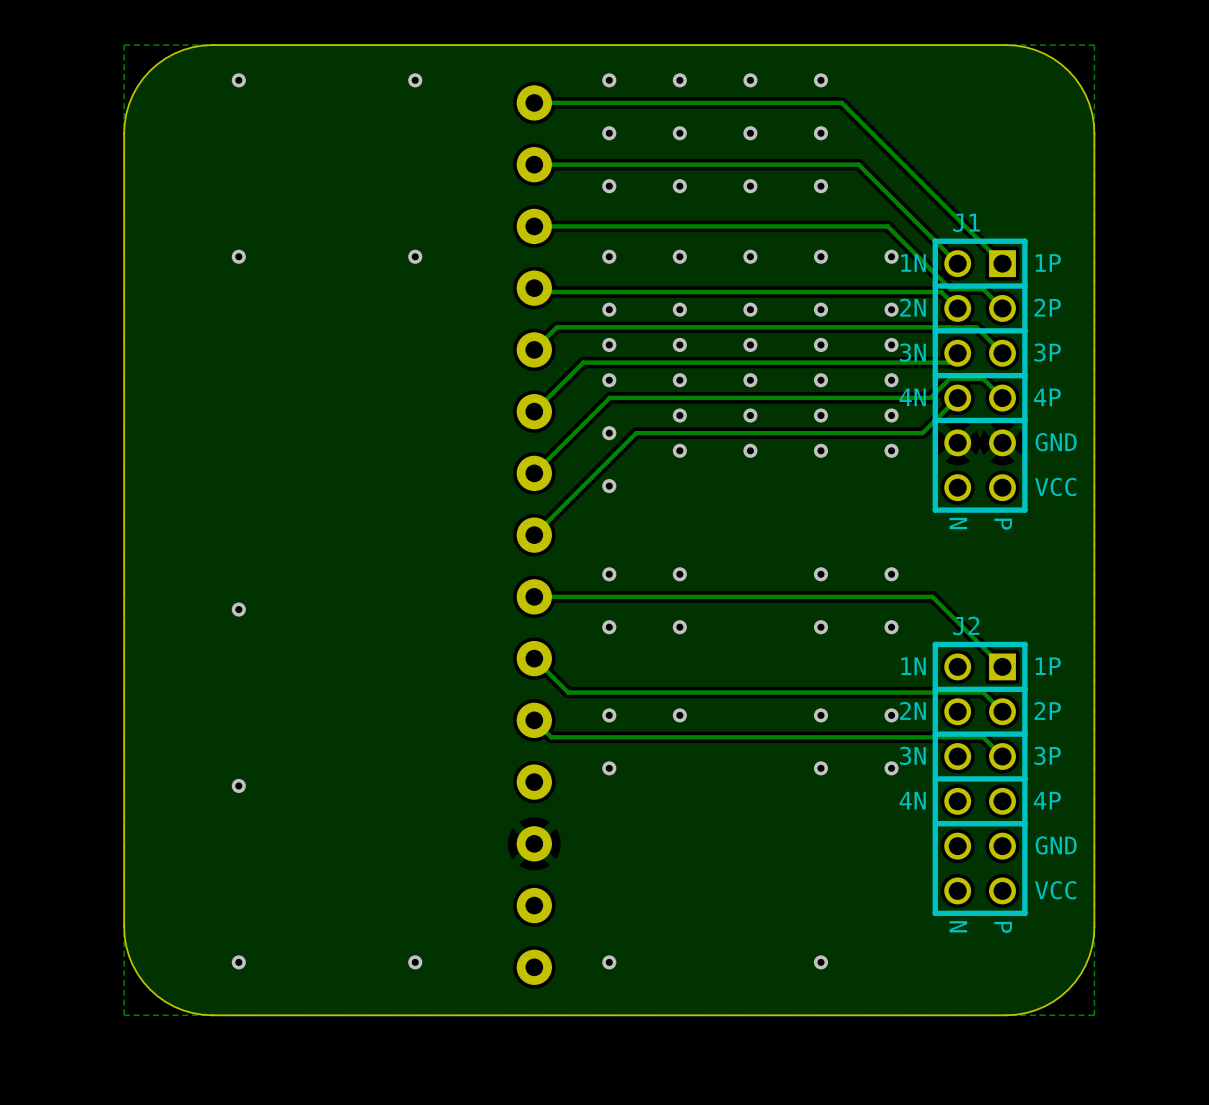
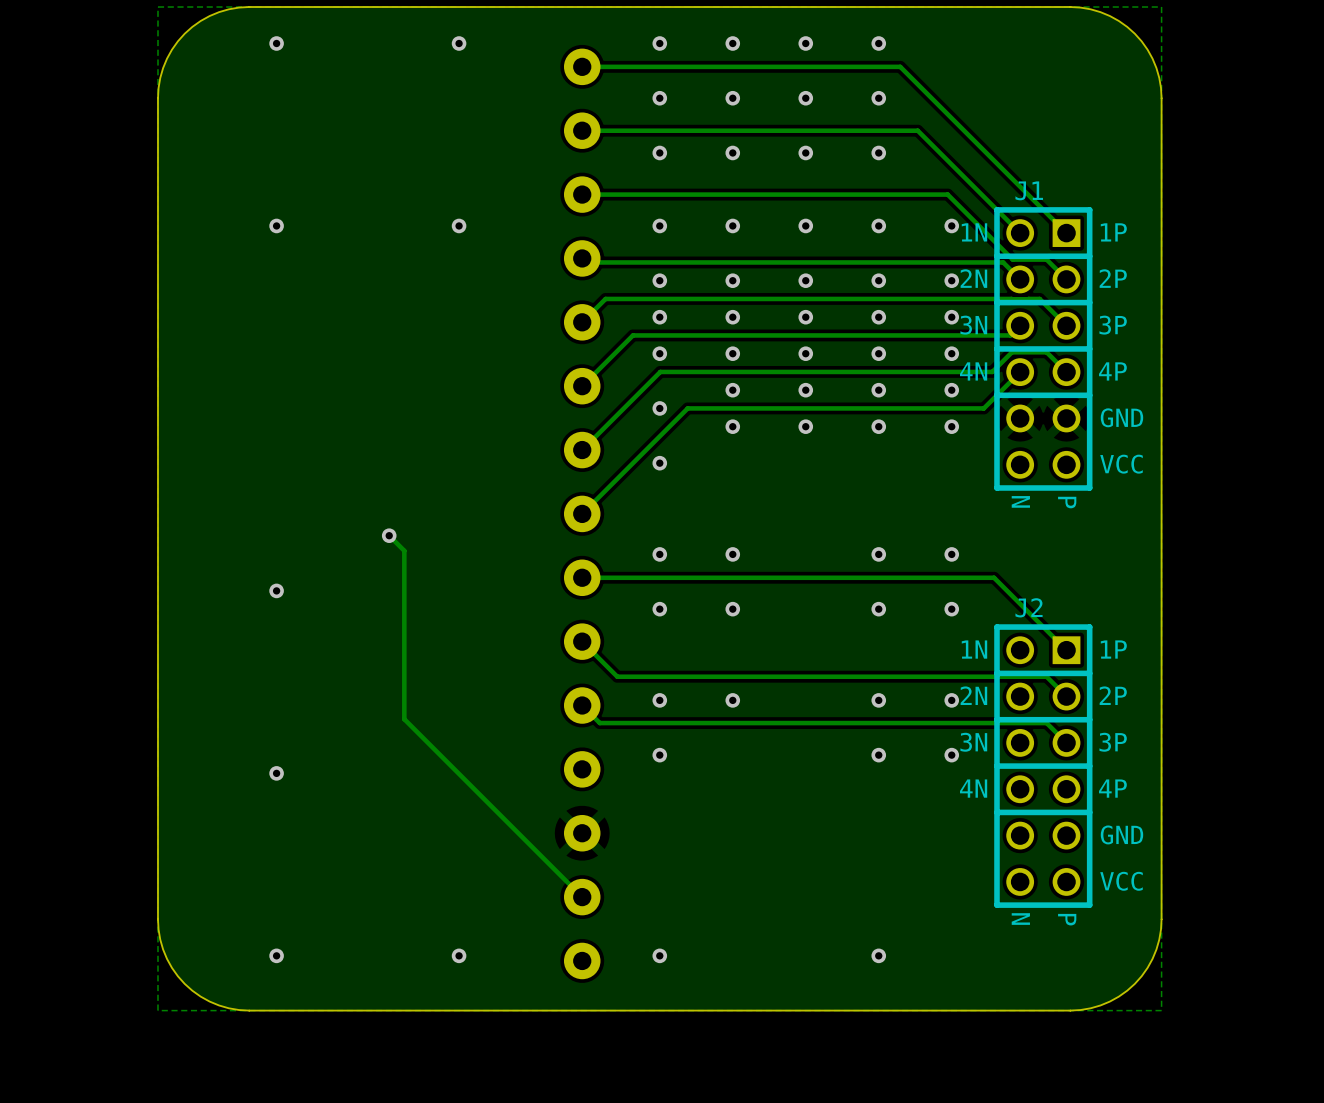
track: none -> (389, 535) (404, 550) (404, 719) (582, 897)
via: none -> (389, 535)

